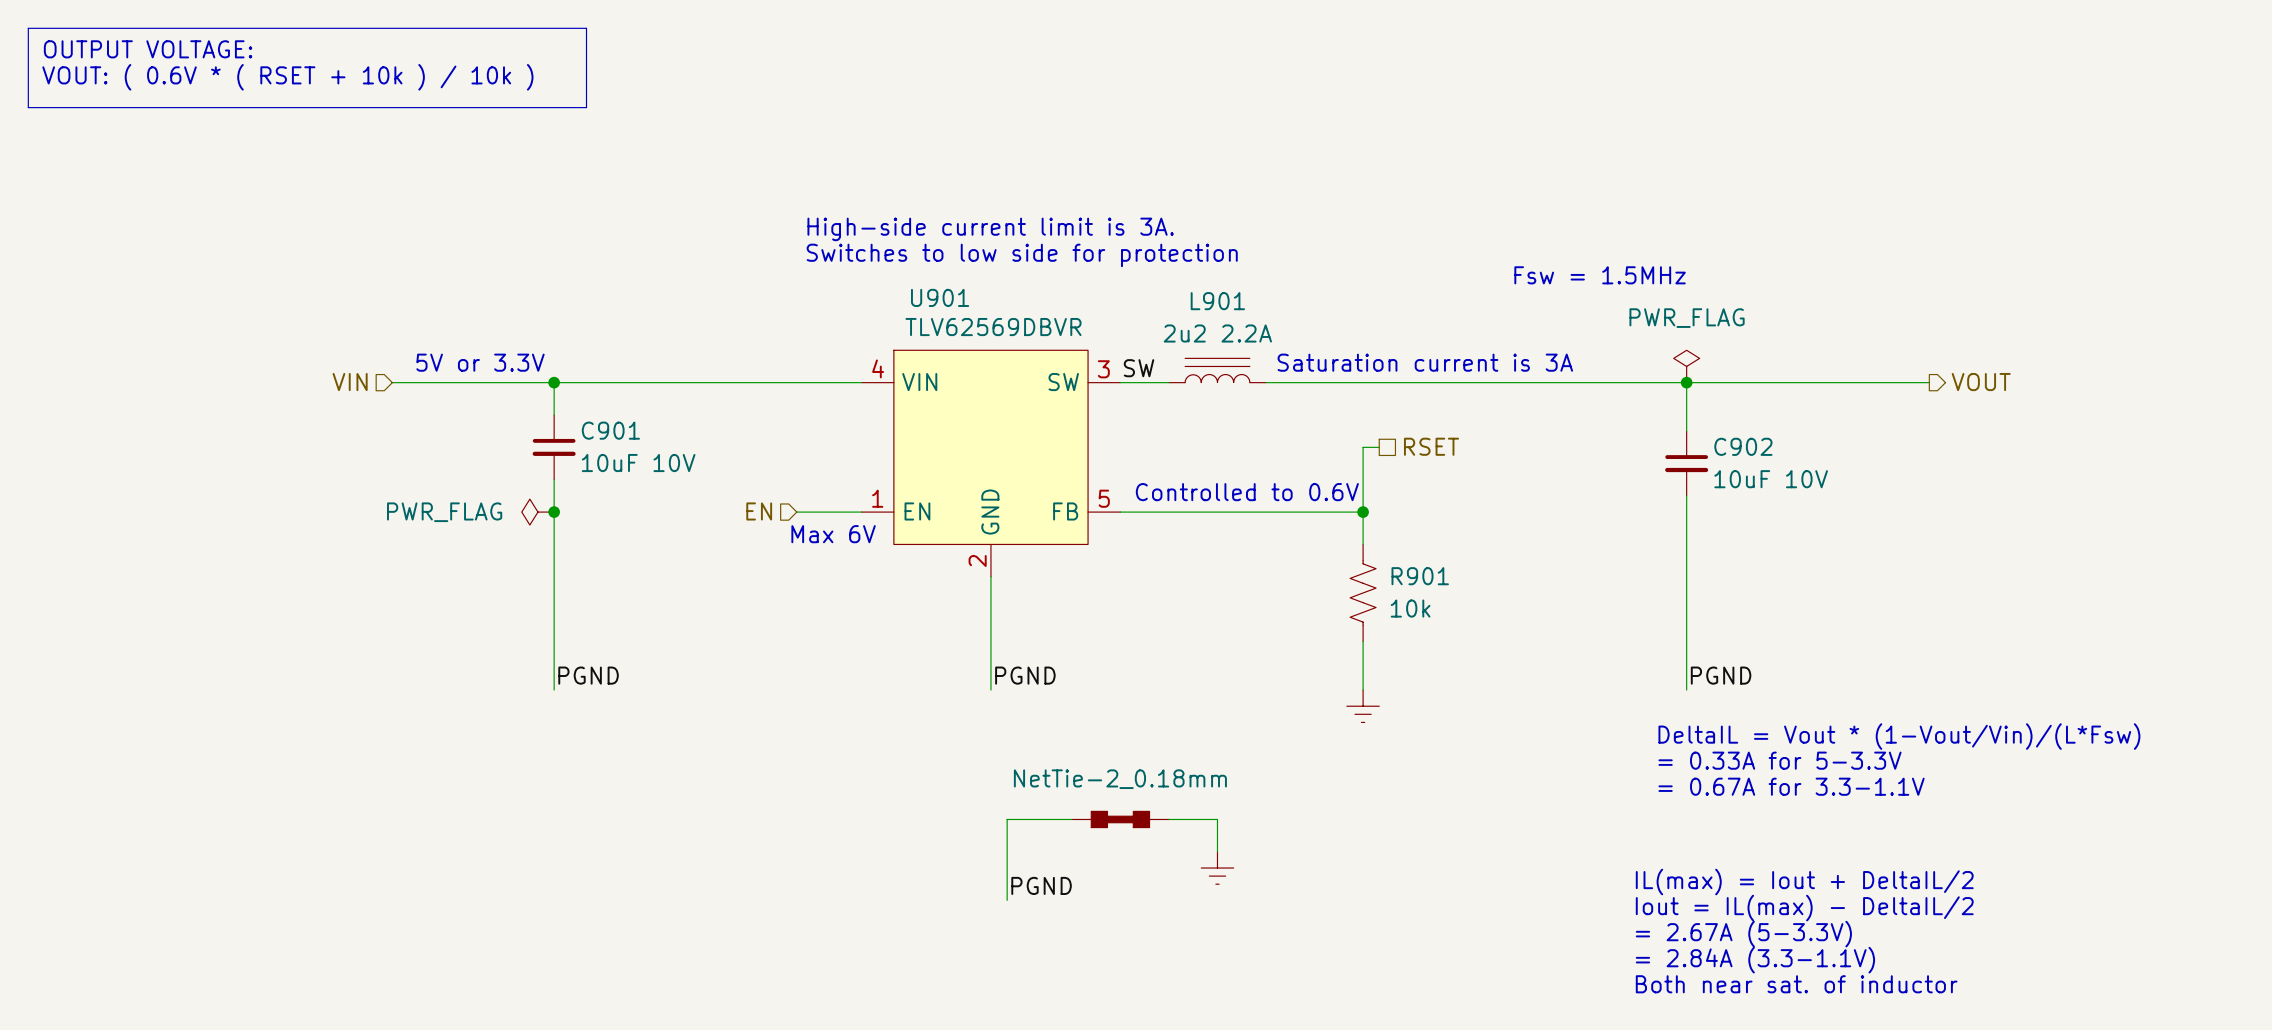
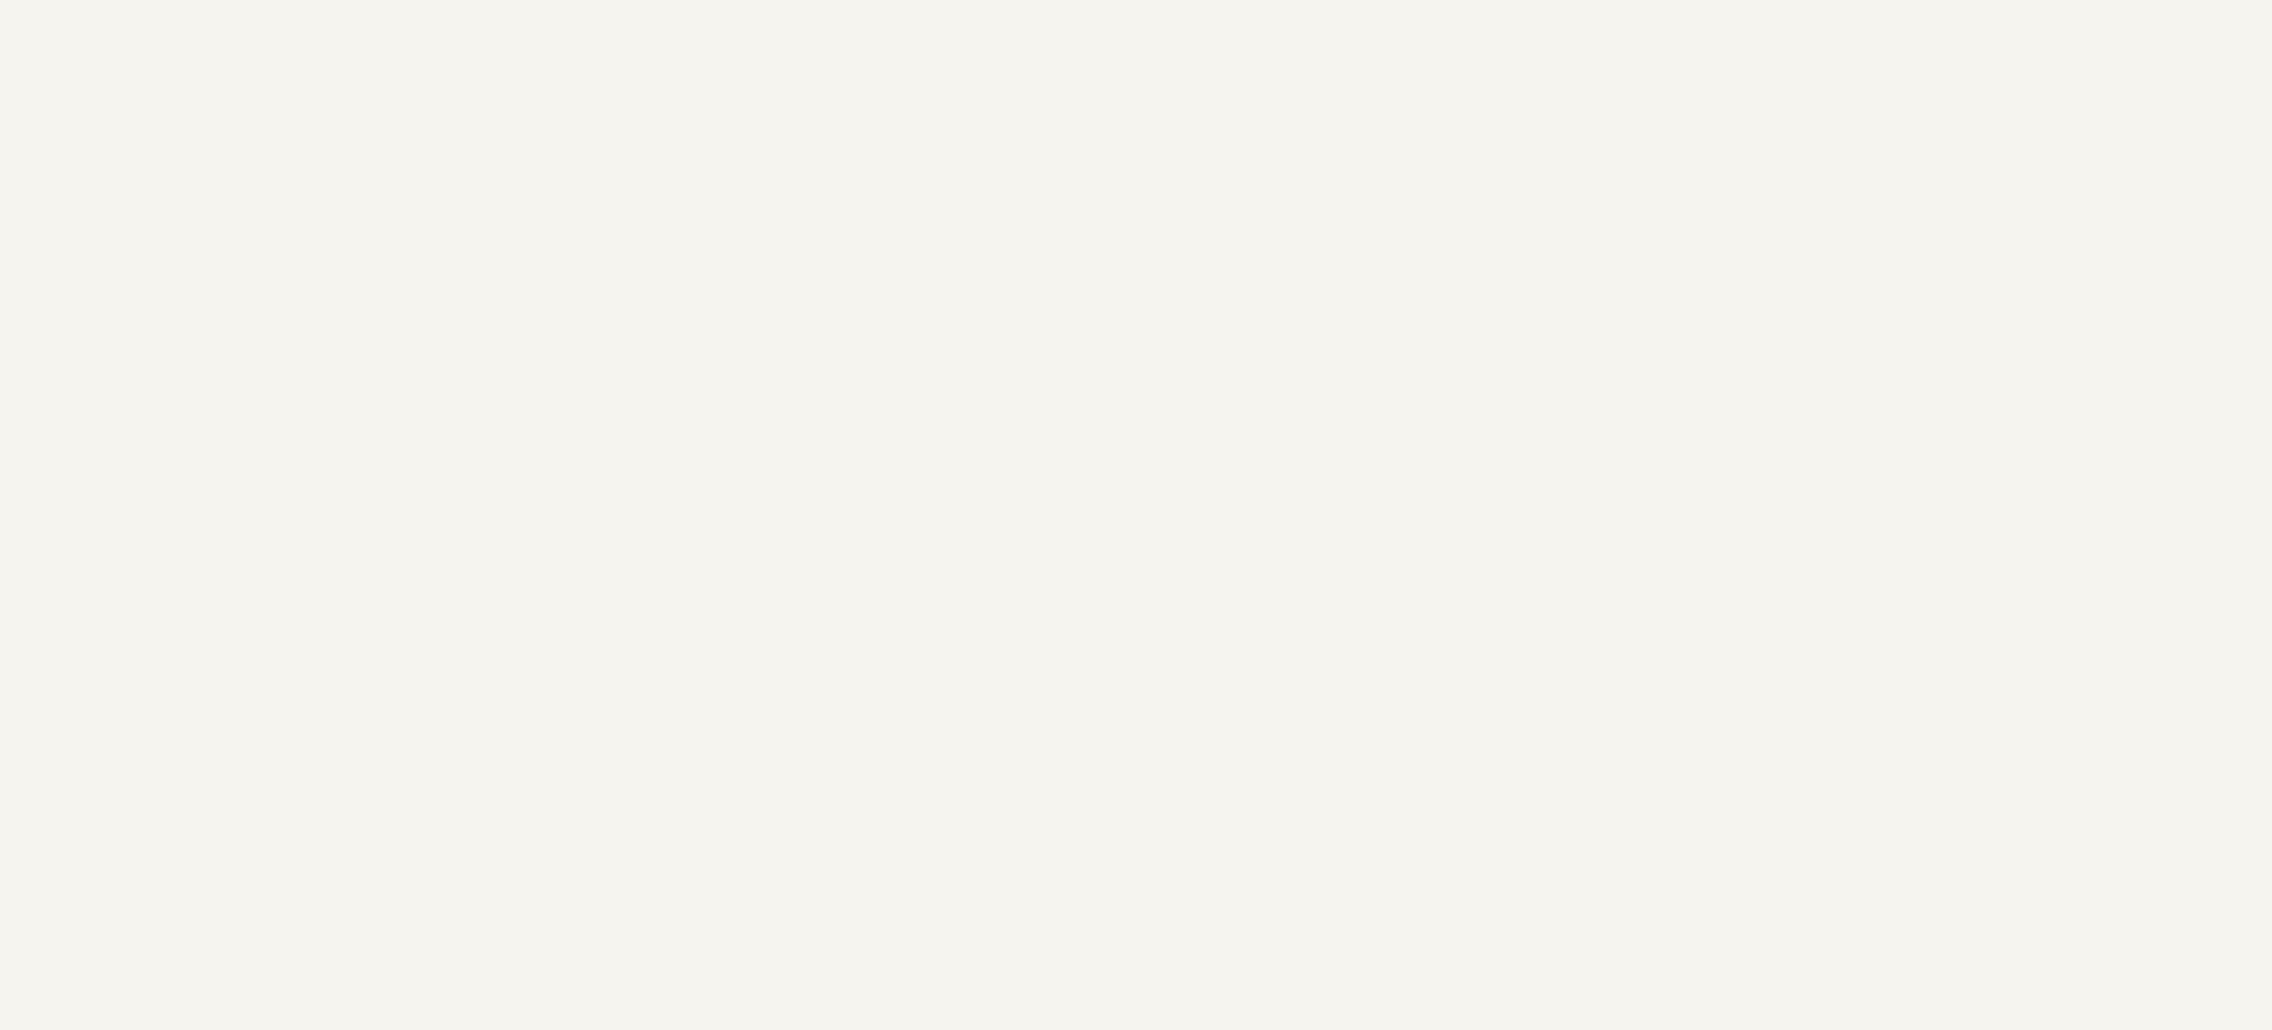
line: (28, 28) (586, 28) (586, 107) (28, 107) (28, 28) -> none
text: OUTPUT VOLTAGE: (148, 49) -> none
text: VOUT: ( 0.6V * ( RSET + 10k ) / 10k ) (287, 77) -> none
text: High-side current limit is 3A. (990, 229) -> none
text: Switches to low side for protection (1022, 255) -> none
text: Fsw = 1.5MHz (1600, 275) -> none
text: 5V or 3.3V (480, 362) -> none
text: Saturation current is 3A (1425, 362) -> none
power symbol: PWR_FLAG (1686, 366) -> none
label: SW (1139, 368) -> none
L901: 2u2 2.2A (1217, 370) -> none
hierarchical label: VIN (350, 382) -> none
wire: (392, 382) (861, 382) -> none
wire: (554, 382) (554, 415) -> none
junction: (554, 382) -> none
wire: (1120, 382) (1168, 382) -> none
wire: (1266, 382) (1929, 382) -> none
wire: (1686, 382) (1686, 431) -> none
junction: (1686, 382) -> none
hierarchical label: VOUT (1981, 382) -> none
hierarchical label: RSET (1431, 446) -> none
C901: 10uF 10V (554, 447) -> none
wire: (1379, 447) (1363, 447) (1363, 544) -> none
U901: TLV62569DBVR (990, 463) -> none
C902: 10uF 10V (1686, 463) -> none
wire: (554, 479) (554, 690) -> none
text: Controlled to 0.6V (1247, 492) -> none
wire: (1686, 495) (1686, 690) -> none
hierarchical label: EN (759, 511) -> none
power symbol: PWR_FLAG (537, 512) -> none
junction: (554, 512) -> none
wire: (796, 512) (861, 512) -> none
wire: (1120, 512) (1363, 512) -> none
junction: (1363, 512) -> none
text: Max 6V (833, 534) -> none
wire: (990, 576) (990, 690) -> none
R901: 10k (1363, 592) -> none
wire: (1363, 641) (1363, 690) -> none
label: PGND (588, 675) -> none
label: PGND (1025, 675) -> none
label: PGND (1721, 675) -> none
power symbol: (1363, 706) -> none
text: DeltaIL = Vout * (1-Vout/Vin)/(L*Fsw) (1899, 736) -> none
text: = 0.33A for 5-3.3V (1780, 760) -> none
text: = 0.67A for 3.3-1.1V (1791, 786) -> none
wire: (1071, 819) (1007, 819) (1007, 900) -> none
part: NetTie-2_0.18mm (1120, 819) -> none
wire: (1168, 819) (1217, 819) (1217, 851) -> none
power symbol: (1217, 868) -> none
text: IL(max) = Iout + DeltaIL/2 (1804, 882) -> none
label: PGND (1041, 885) -> none
text: Iout = IL(max) - DeltaIL/2 (1804, 908) -> none
text: = 2.67A (5-3.3V) (1743, 934) -> none
text: = 2.84A (3.3-1.1V) (1755, 960) -> none
text: Both near sat. of inductor (1796, 984) -> none

